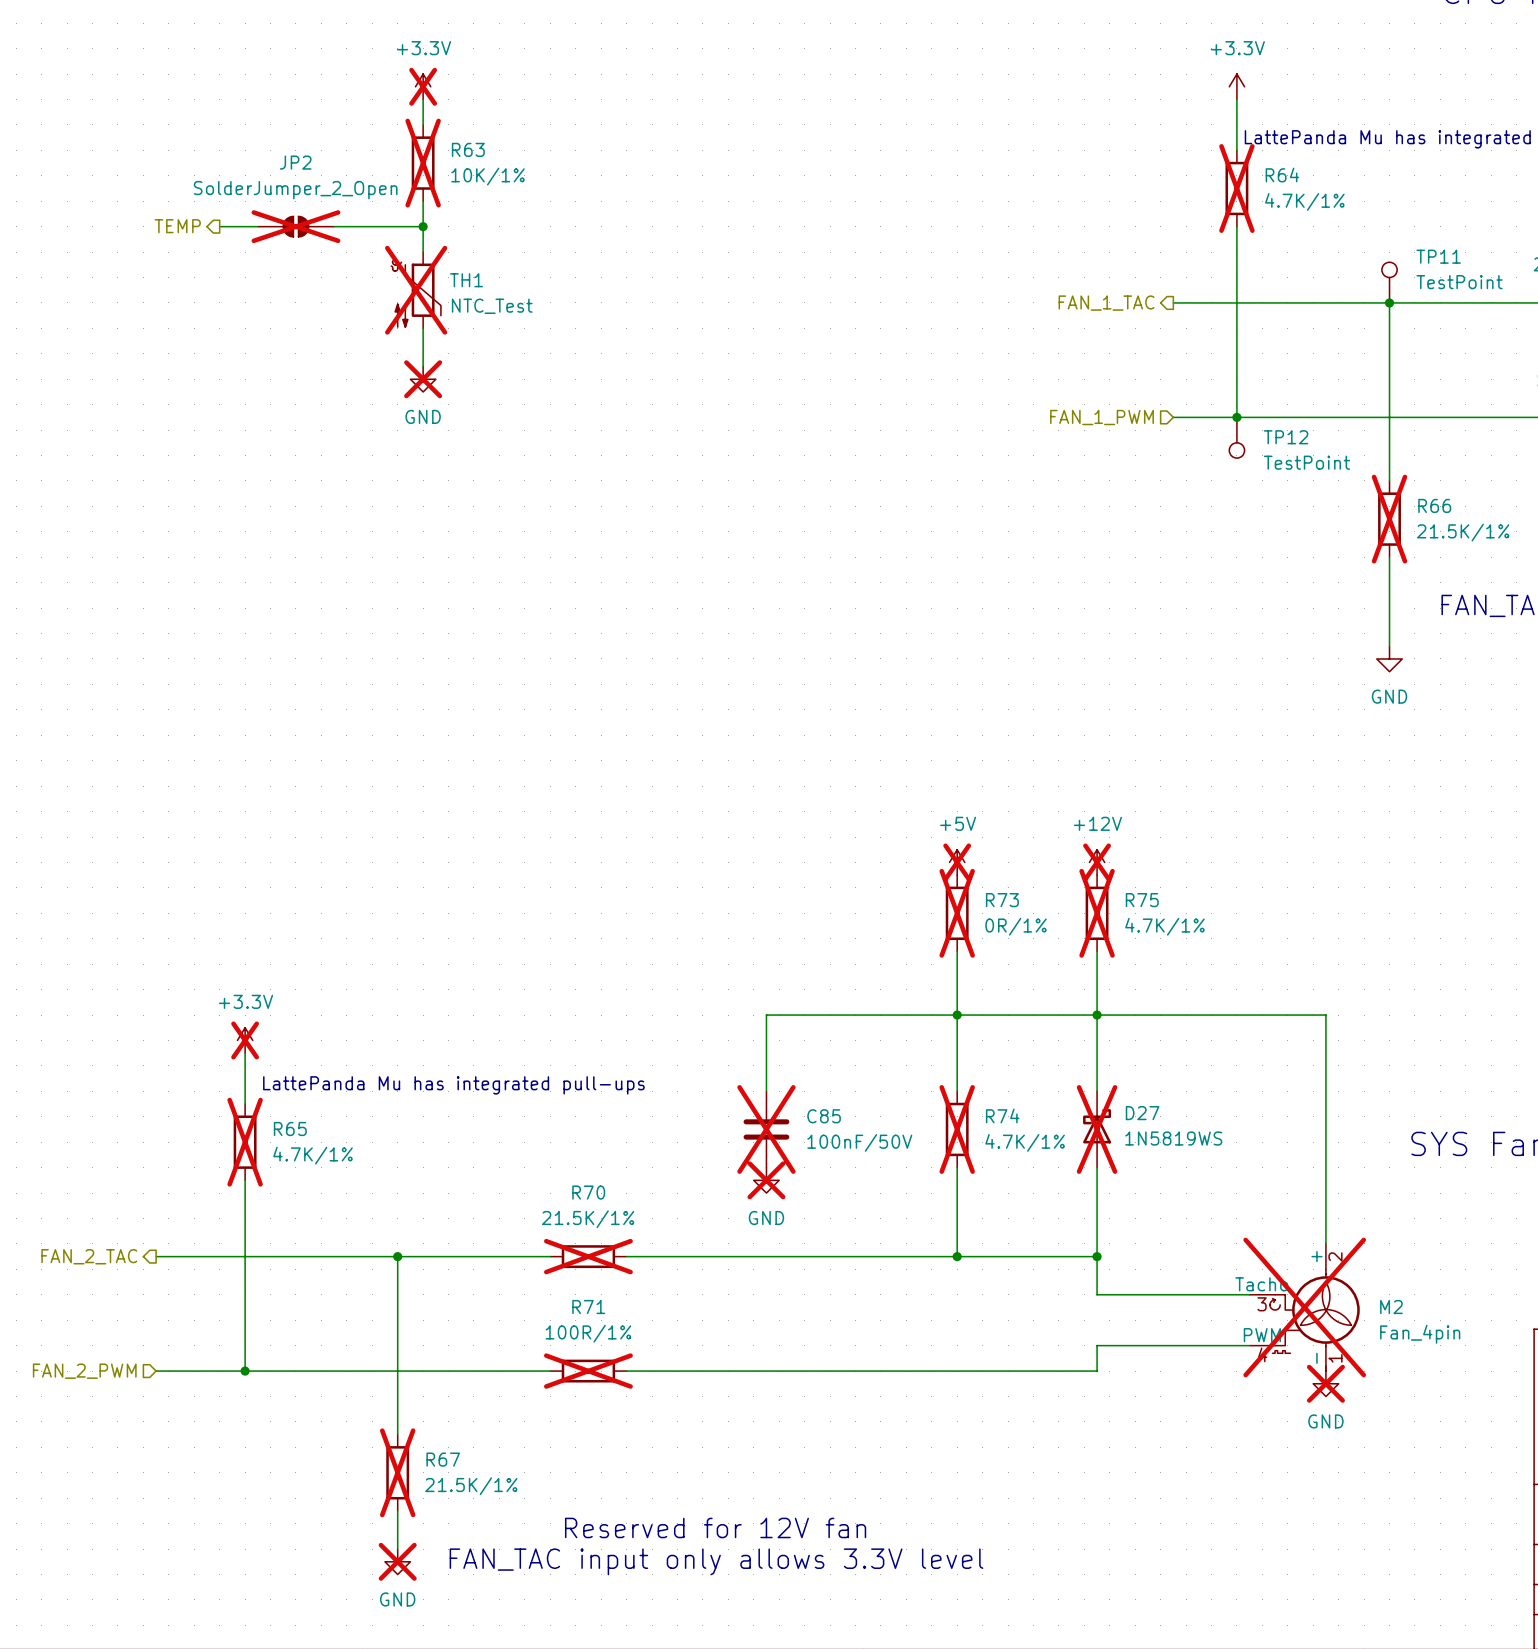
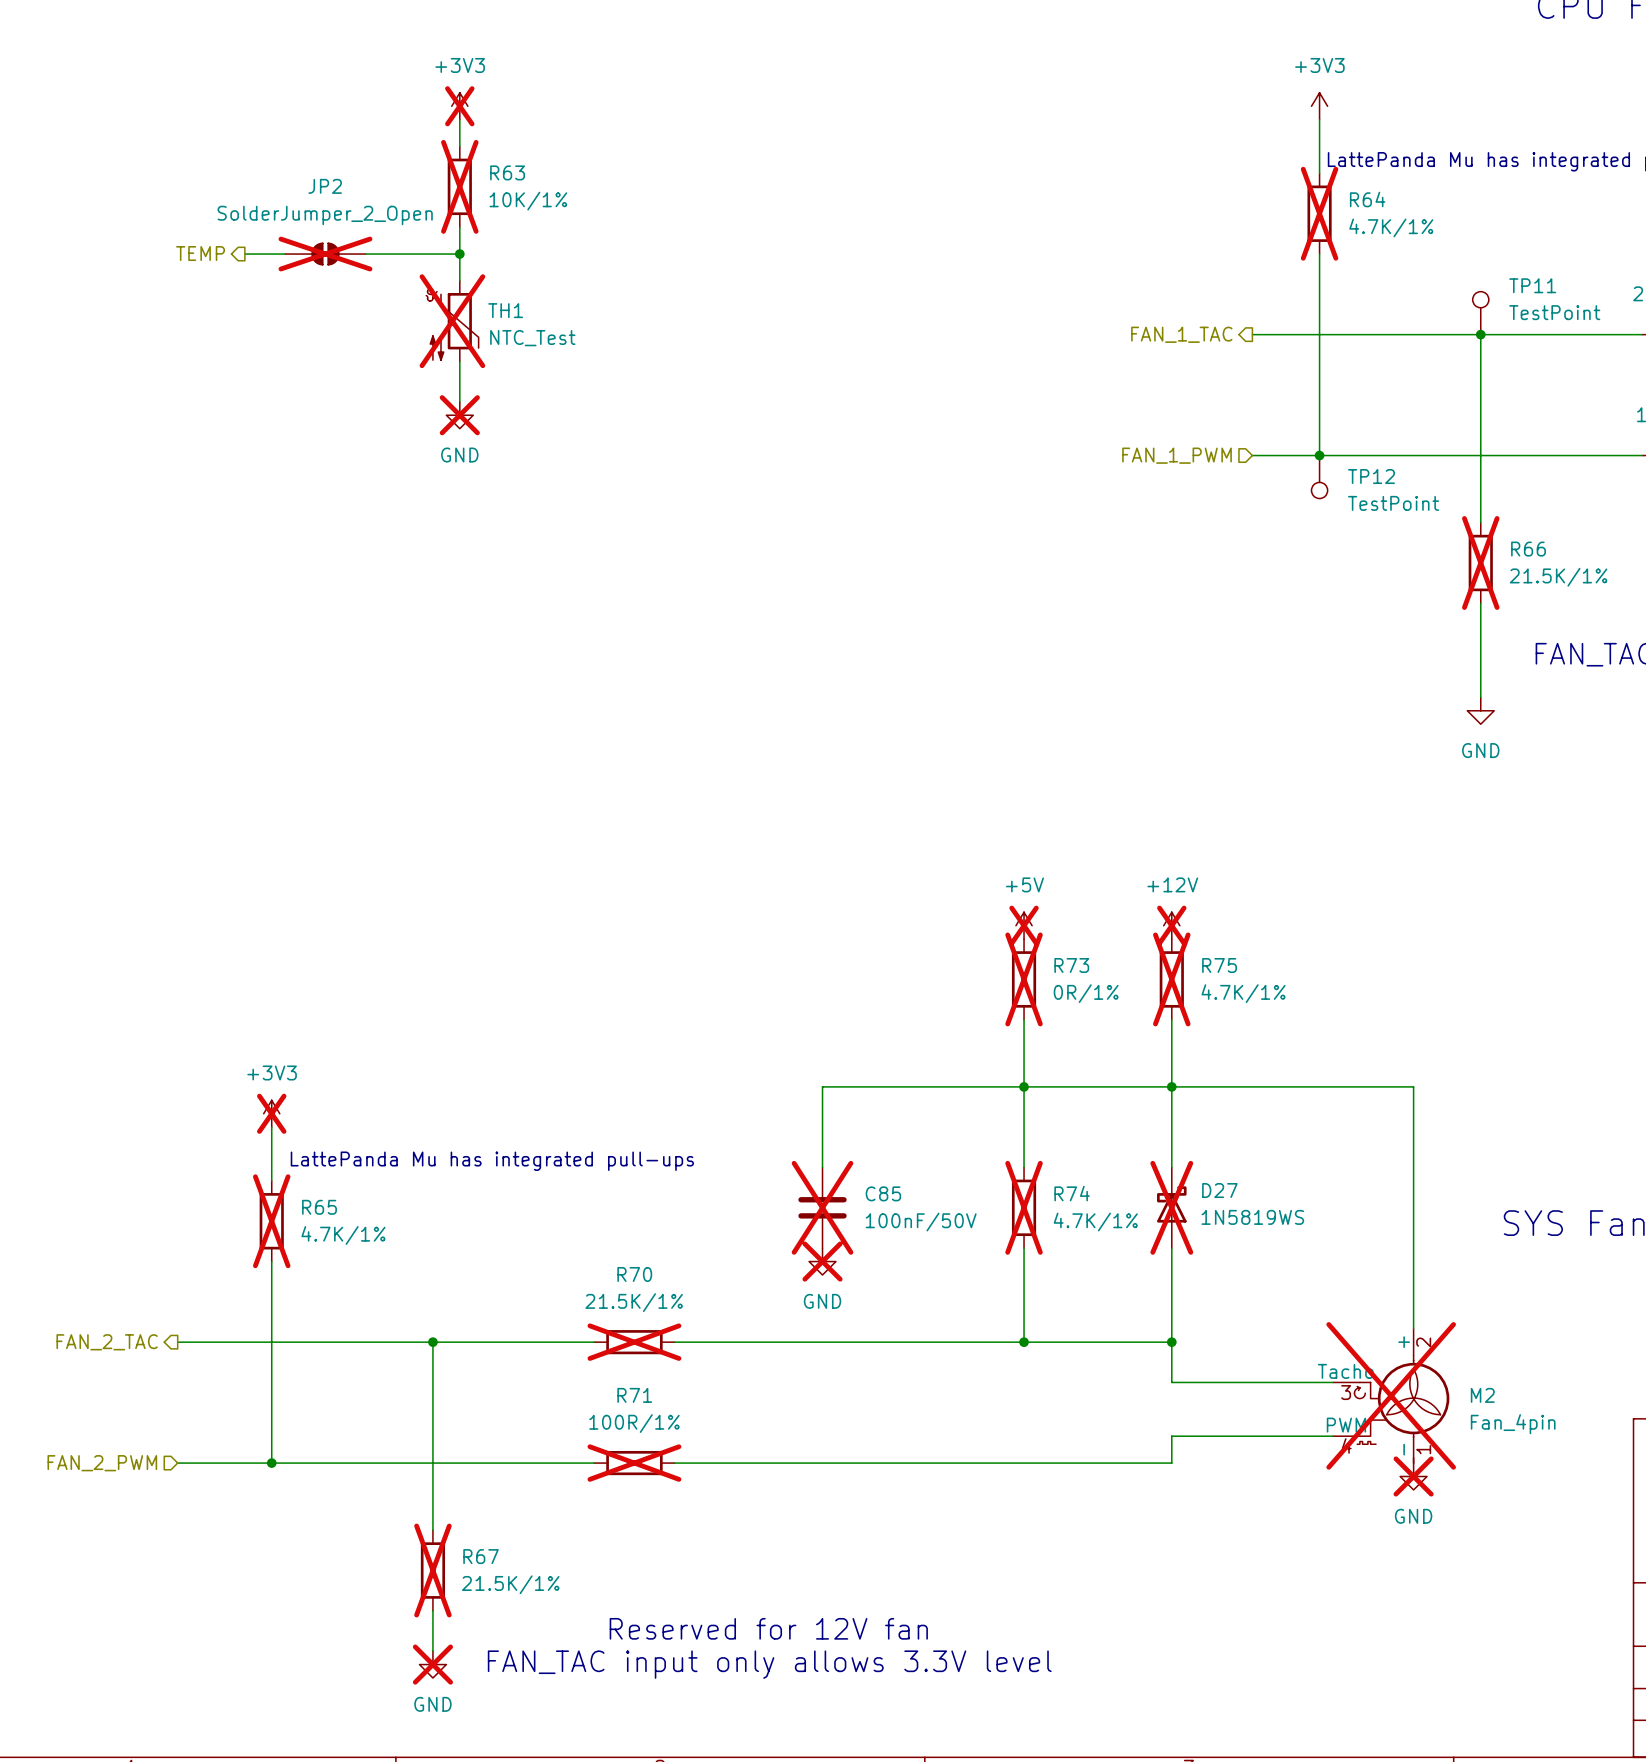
power symbol: +3.3V (423, 86) -> +3V3 (459, 106)
power symbol: +3.3V (1236, 86) -> +3V3 (1319, 106)
power symbol: +3.3V (245, 1040) -> +3V3 (271, 1113)

